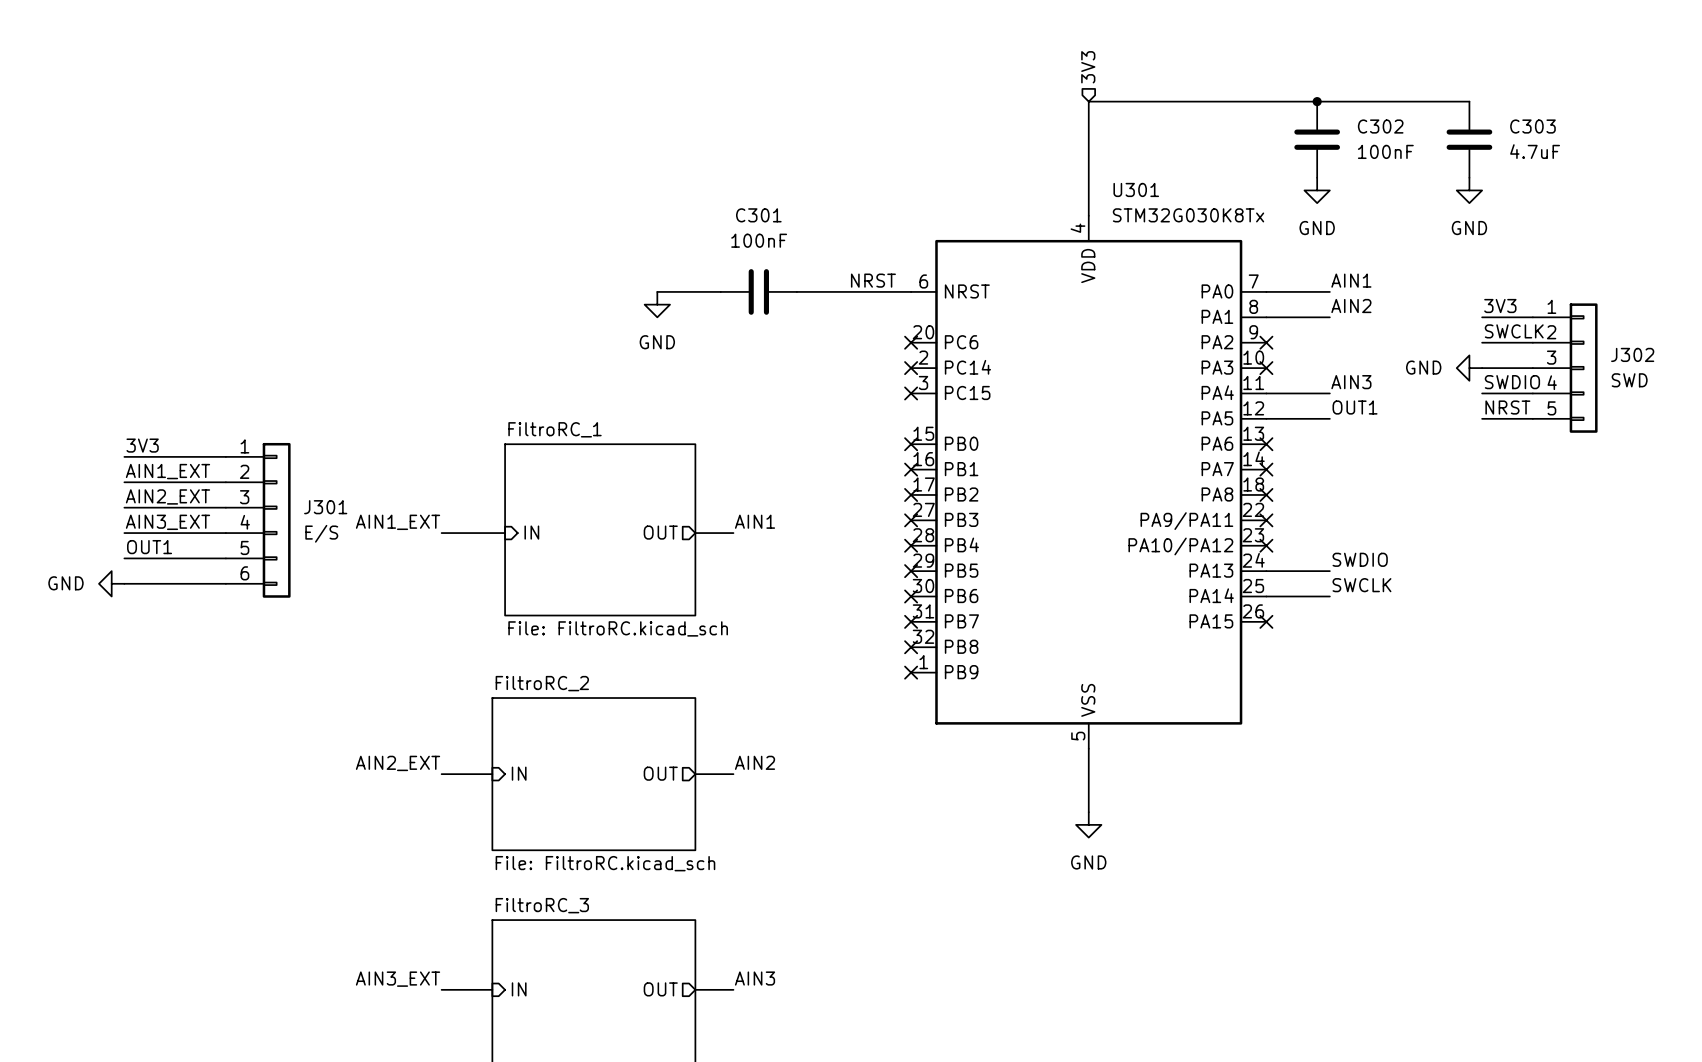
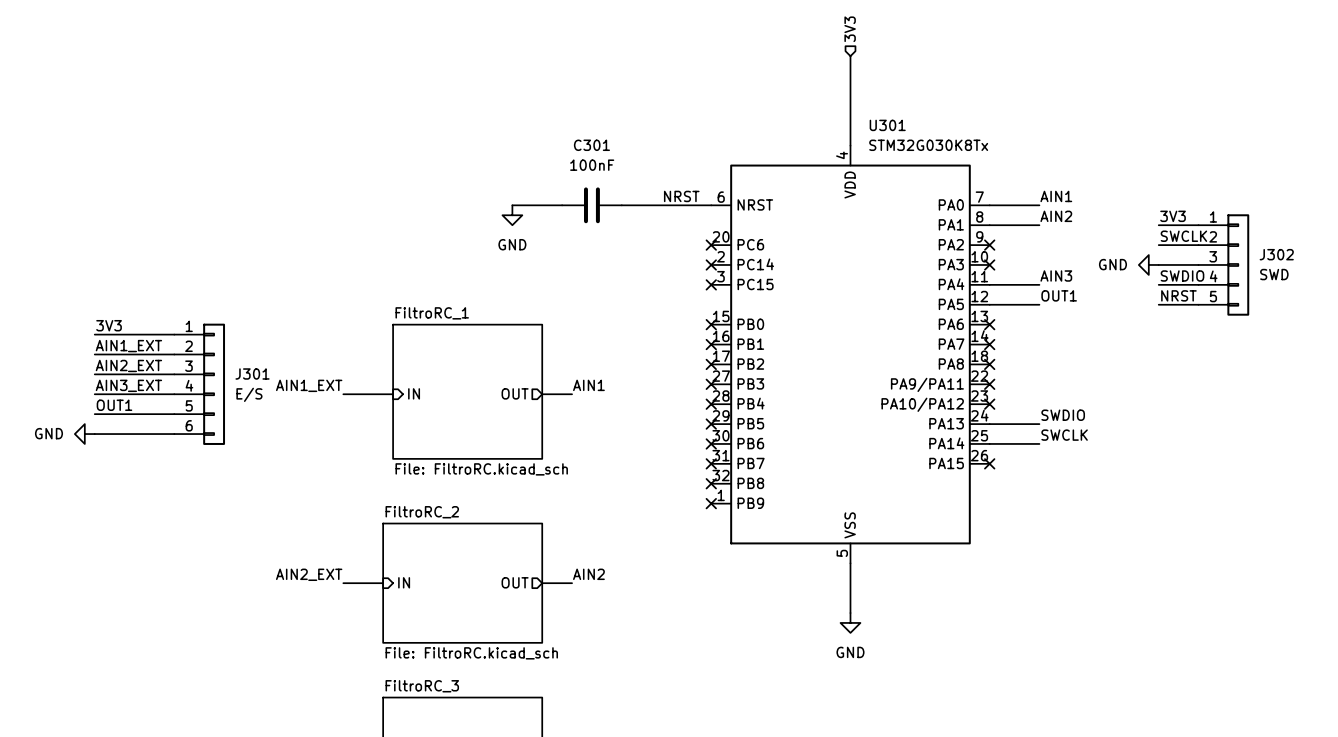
wire: (1088, 101) (1469, 101) -> none
junction: (1317, 101) -> none
C302: 100nF (1317, 139) -> none
C303: 4.7uF (1469, 139) -> none
power symbol: GND (1317, 190) -> none
power symbol: GND (1469, 190) -> none

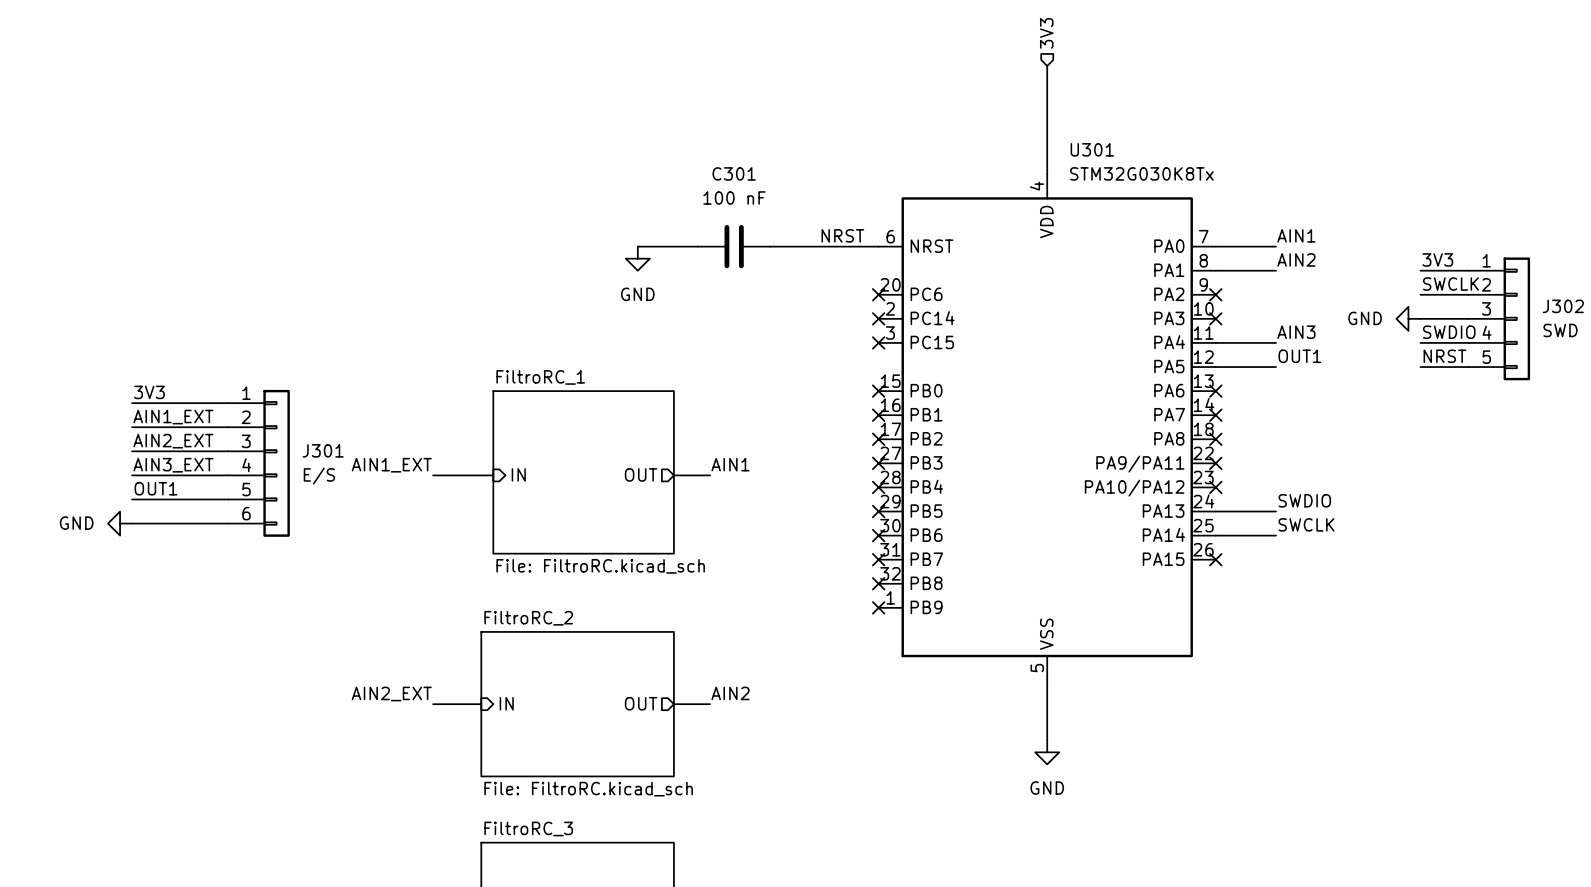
C301 value: 100nF (592, 165) -> 100 nF (734, 198)

